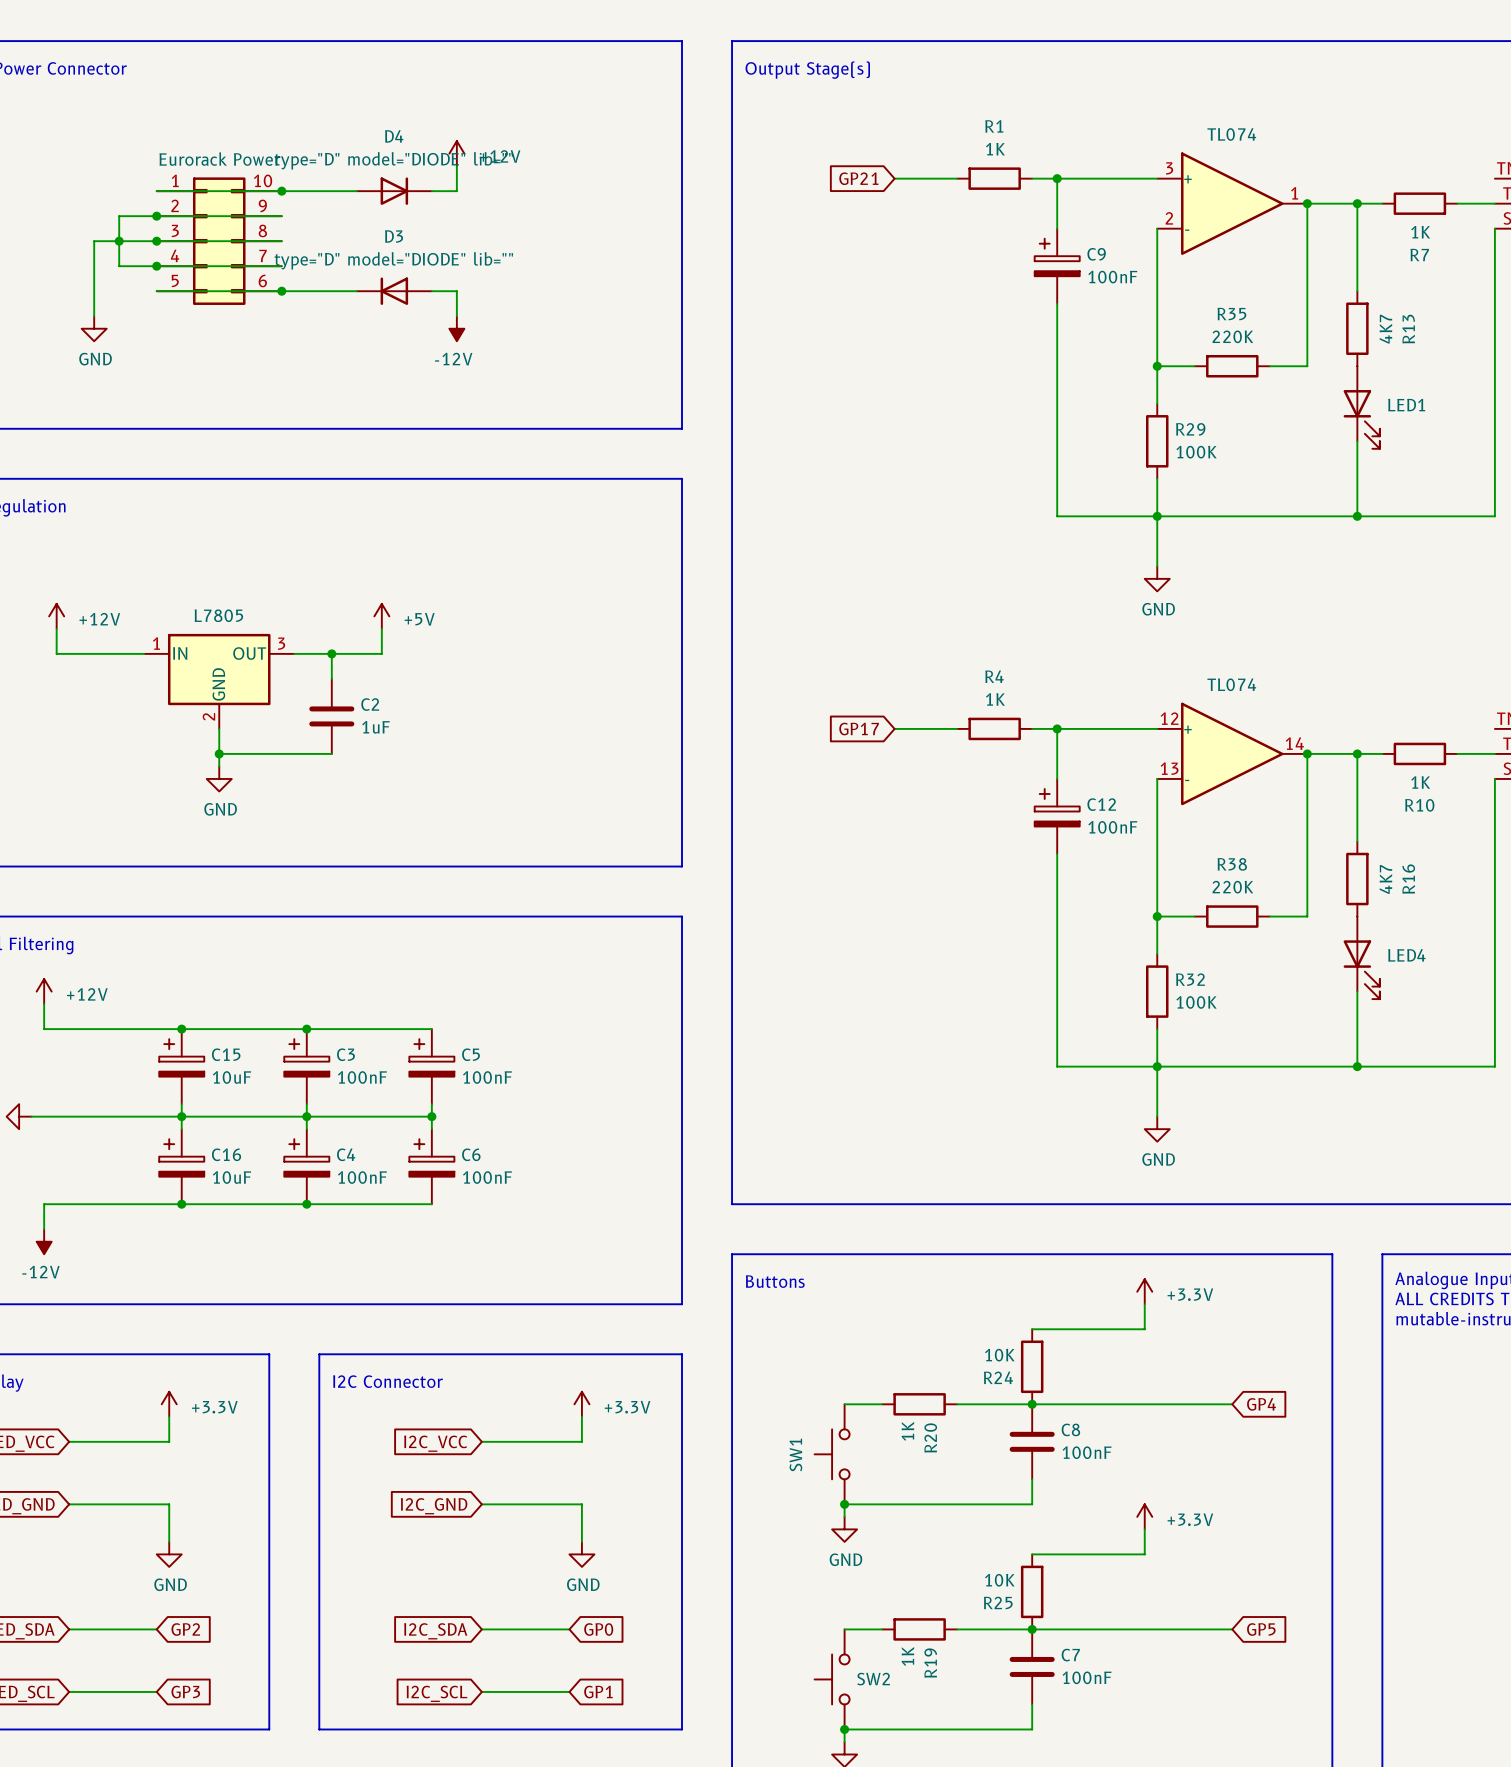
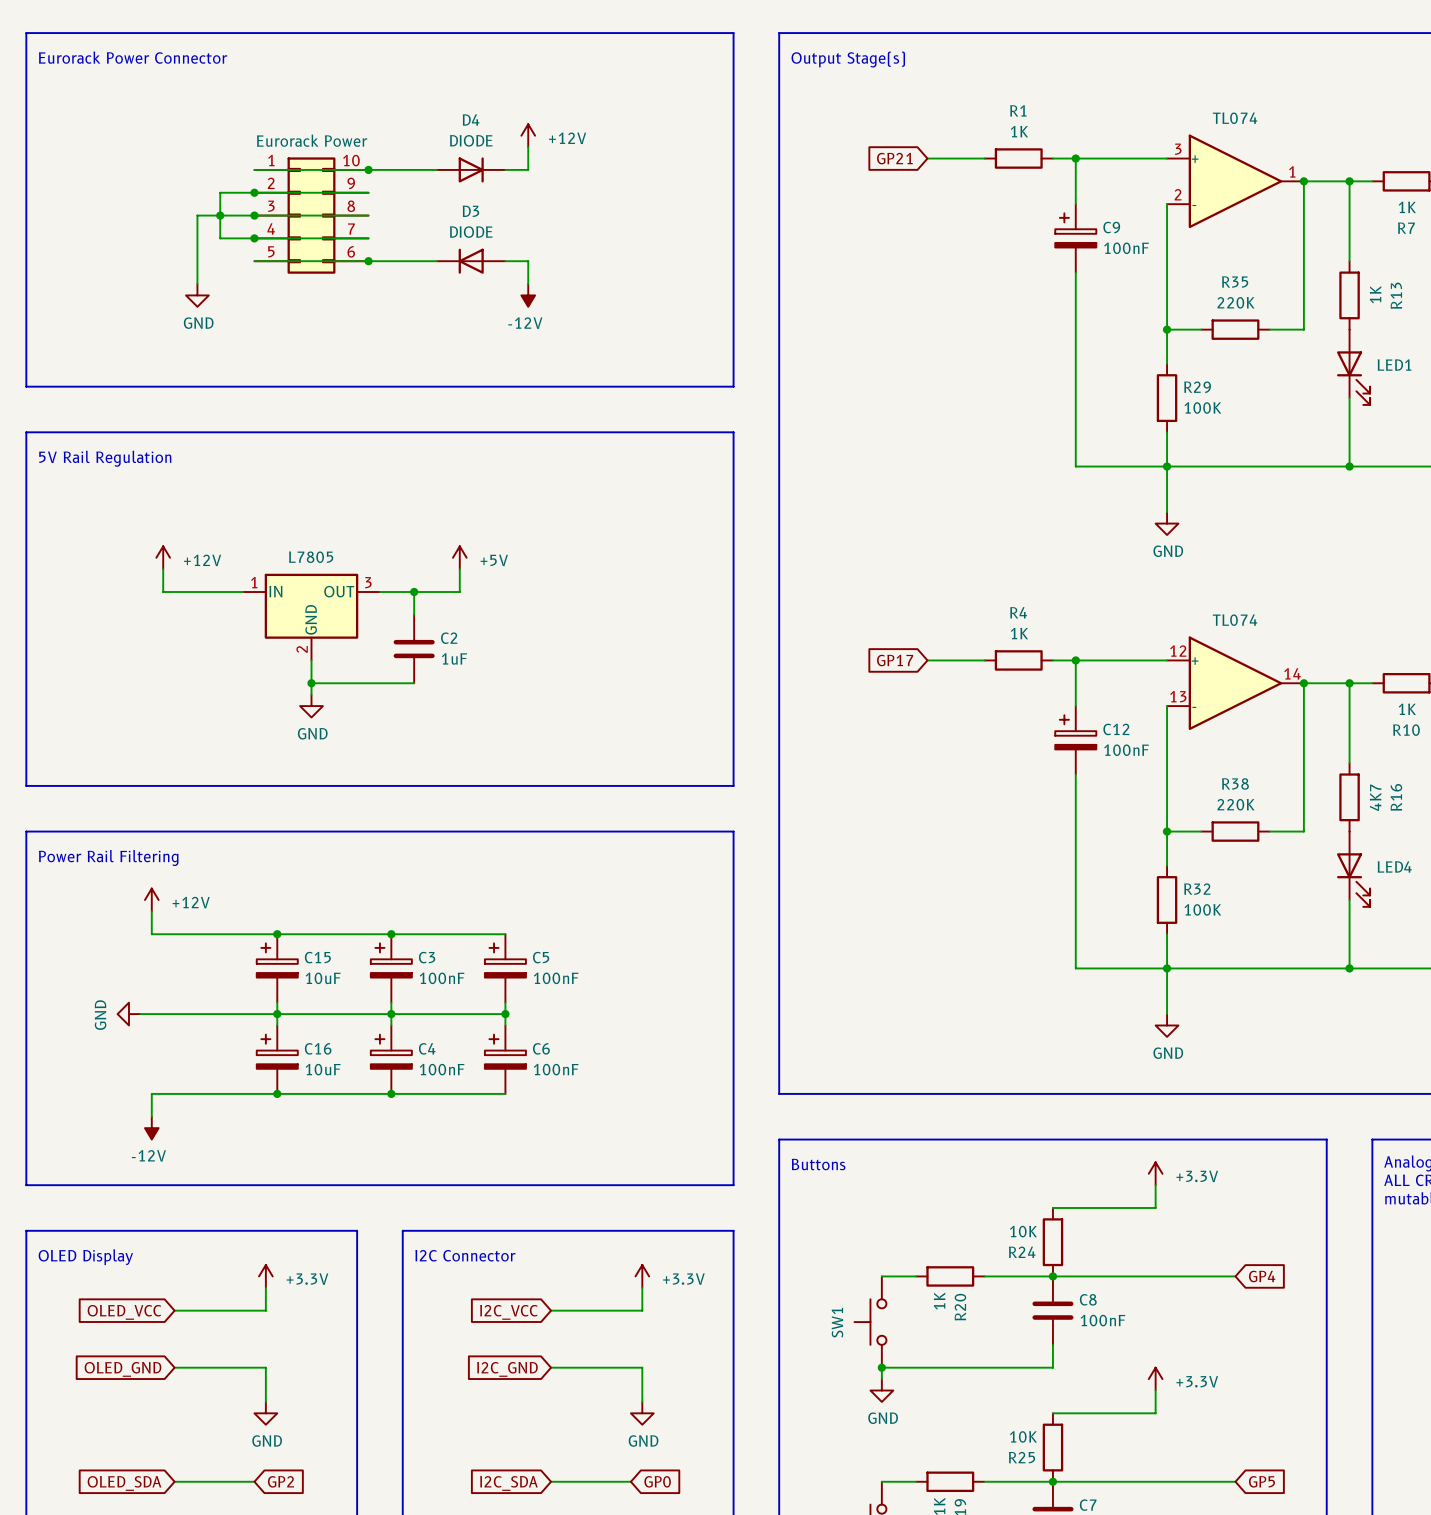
D4 value: type="D" model="DIODE" lib="" (393, 160) -> DIODE (471, 140)
D3 value: type="D" model="DIODE" lib="" (393, 260) -> DIODE (471, 232)
R13 value: 4K7 (1385, 329) -> 1K (1375, 294)

